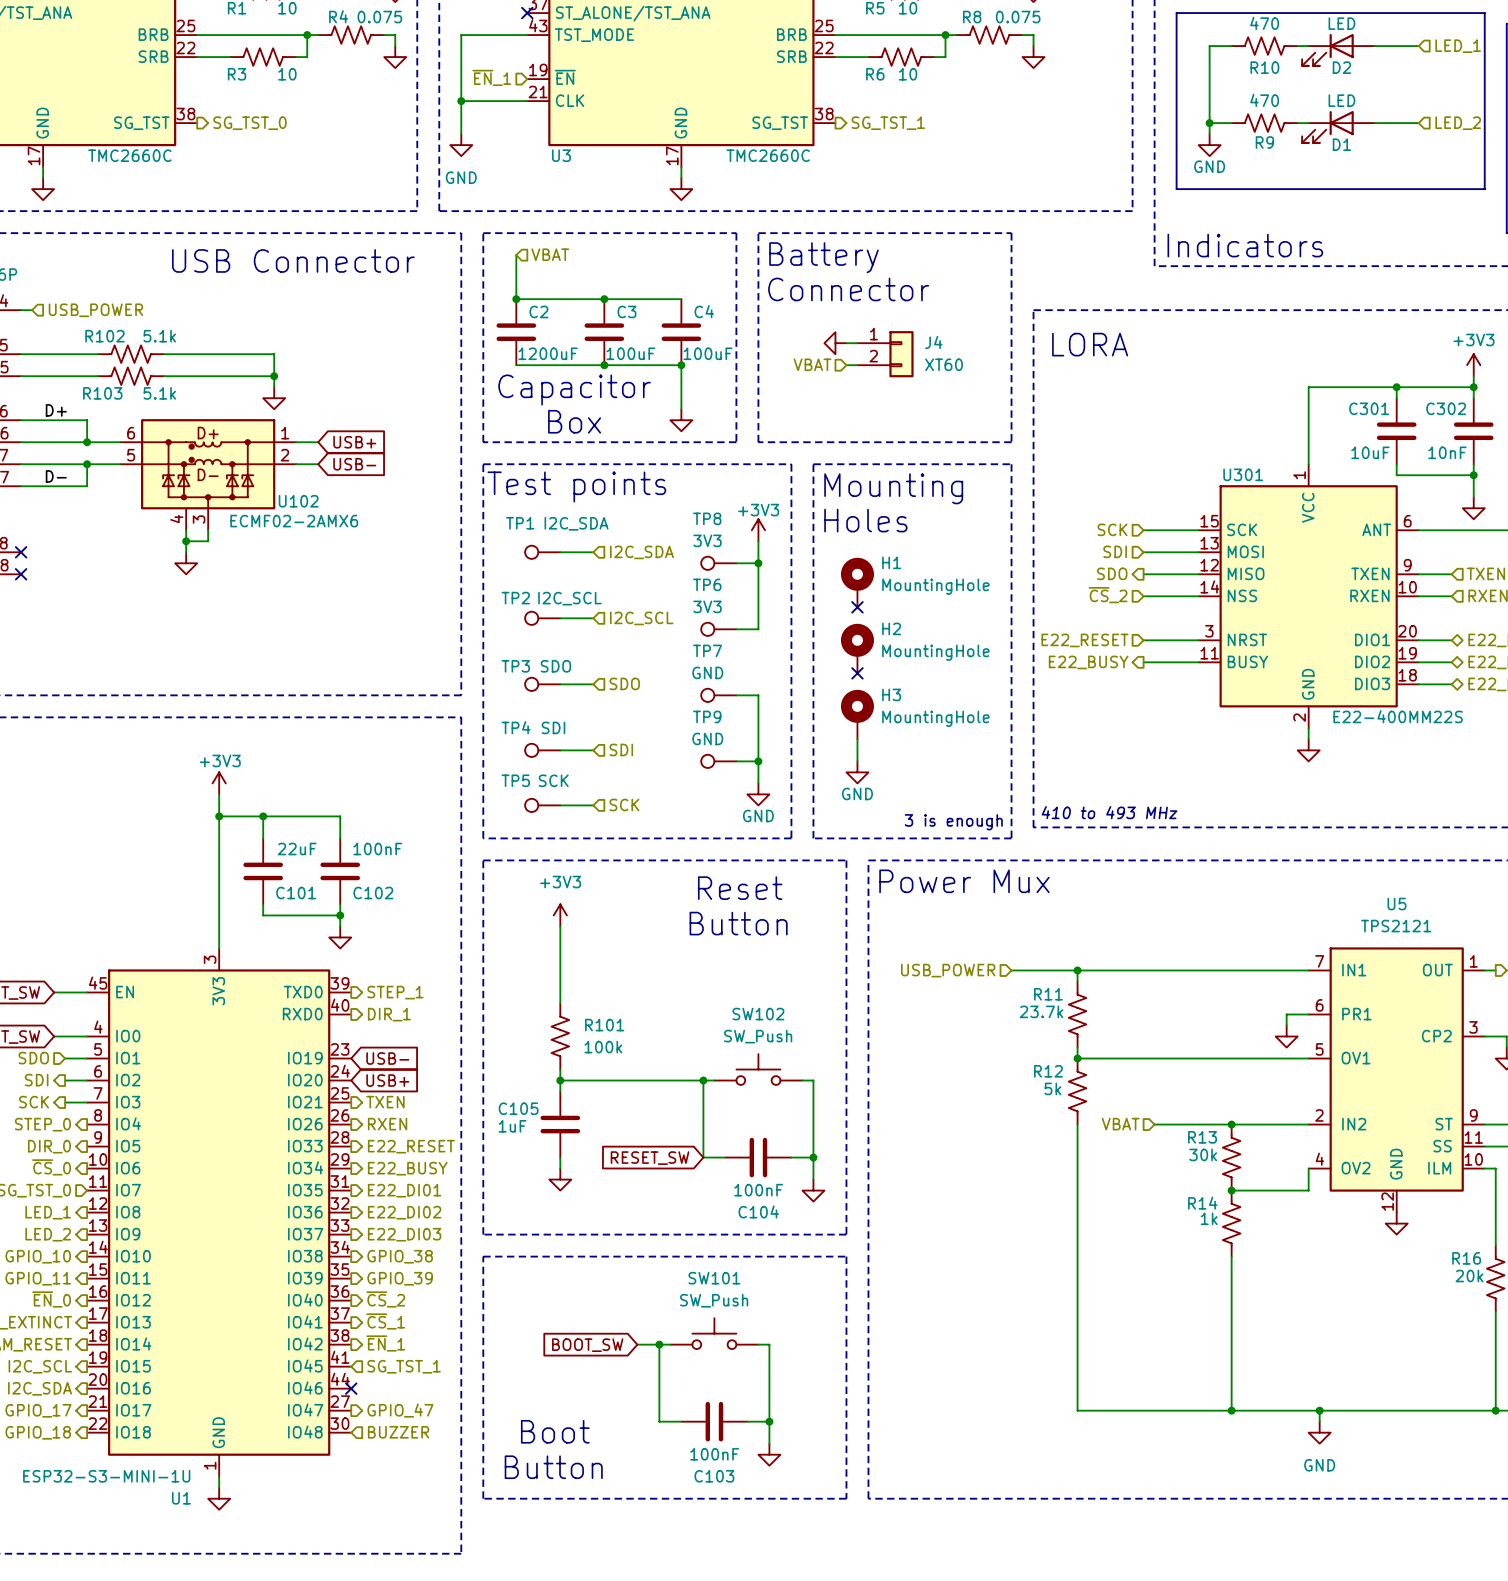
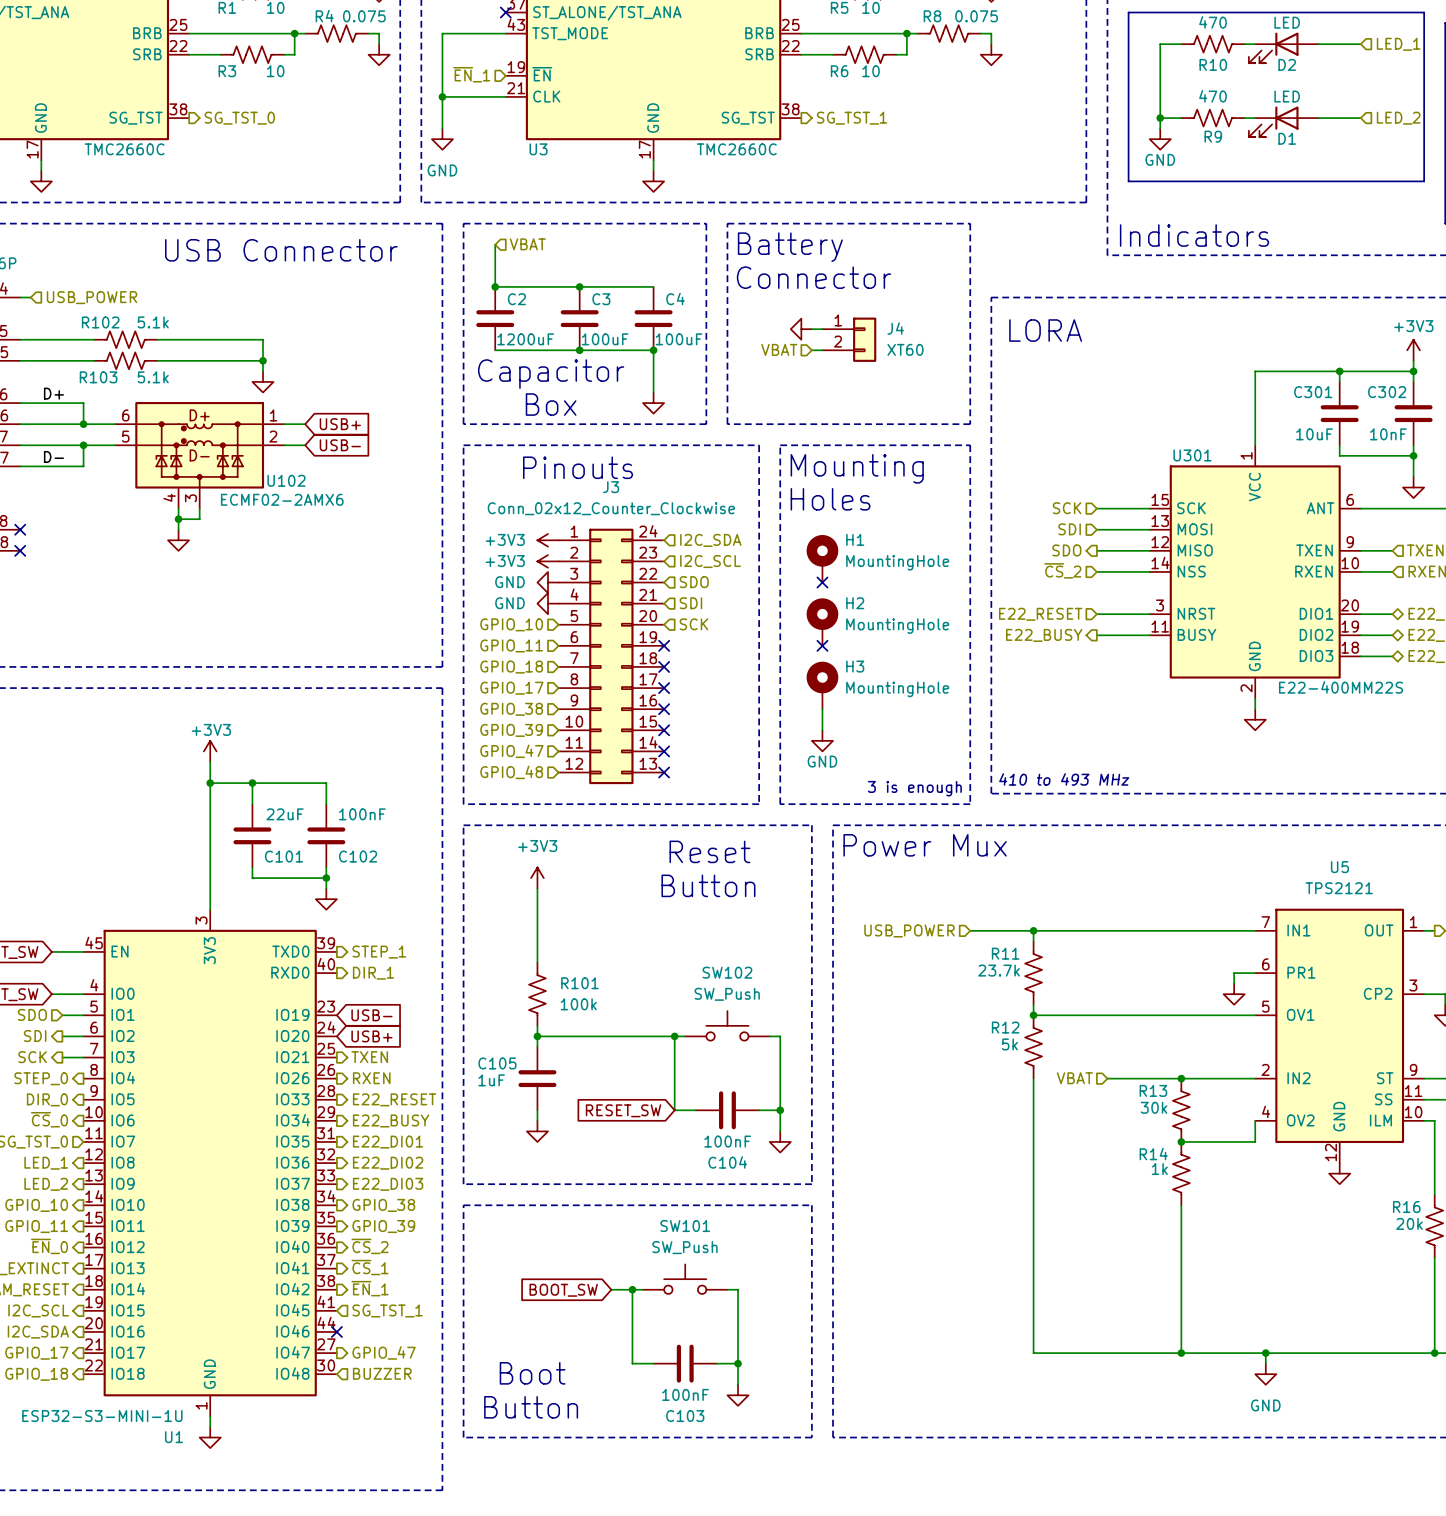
text: Test points (576, 486) -> none
text: none -> Pinouts (578, 467)
power symbol: +3V3 (758, 530) -> none
wire: (758, 541) (758, 629) (736, 629) -> none
TP1: I2C_SDA (542, 552) -> none
wire: (560, 552) (593, 552) -> none
hierarchical label position: I2C_SDA (641, 552) -> I2C_SDA (710, 540)
power symbol: none -> +3V3 (548, 540)
TP8: 3V3 (718, 563) -> none
wire: (736, 563) (758, 563) -> none
junction: (758, 563) -> none
power symbol: none -> +3V3 (548, 561)
power symbol: none -> GND (548, 582)
TP2: I2C_SCL (542, 618) -> none
wire: (560, 618) (593, 618) -> none
hierarchical label position: I2C_SCL (641, 618) -> I2C_SCL (710, 561)
power symbol: none -> GND (548, 603)
TP6: 3V3 (718, 629) -> none
hierarchical label: none -> GPIO_10 (511, 624)
hierarchical label: none -> GPIO_11 (511, 645)
no-connect mark: none -> (664, 645)
hierarchical label position: SDO (624, 683) -> SDO (694, 582)
TP3: SDO (542, 684) -> none
wire: (560, 684) (593, 684) -> none
J3: none -> Conn_02x12_Counter_Clockwise (611, 656)
hierarchical label: none -> GPIO_18 (511, 667)
no-connect mark: none -> (664, 666)
TP7: GND (718, 695) -> none
wire: (736, 695) (758, 695) (758, 783) -> none
hierarchical label: none -> GPIO_17 (511, 688)
no-connect mark: none -> (664, 688)
hierarchical label: none -> GPIO_38 (511, 709)
no-connect mark: none -> (664, 709)
hierarchical label position: SDI (621, 749) -> SDI (690, 603)
TP4: SDI (542, 750) -> none
wire: (560, 750) (593, 750) -> none
hierarchical label: none -> GPIO_39 (511, 730)
no-connect mark: none -> (664, 730)
TP9: GND (718, 761) -> none
wire: (736, 761) (758, 761) -> none
junction: (758, 761) -> none
hierarchical label: none -> GPIO_47 (511, 751)
no-connect mark: none -> (664, 751)
power symbol: GND (758, 794) -> none
hierarchical label position: SCK (624, 804) -> SCK (693, 624)
hierarchical label: none -> GPIO_48 (511, 772)
TP5: SCK (542, 805) -> none
no-connect mark: none -> (664, 772)

